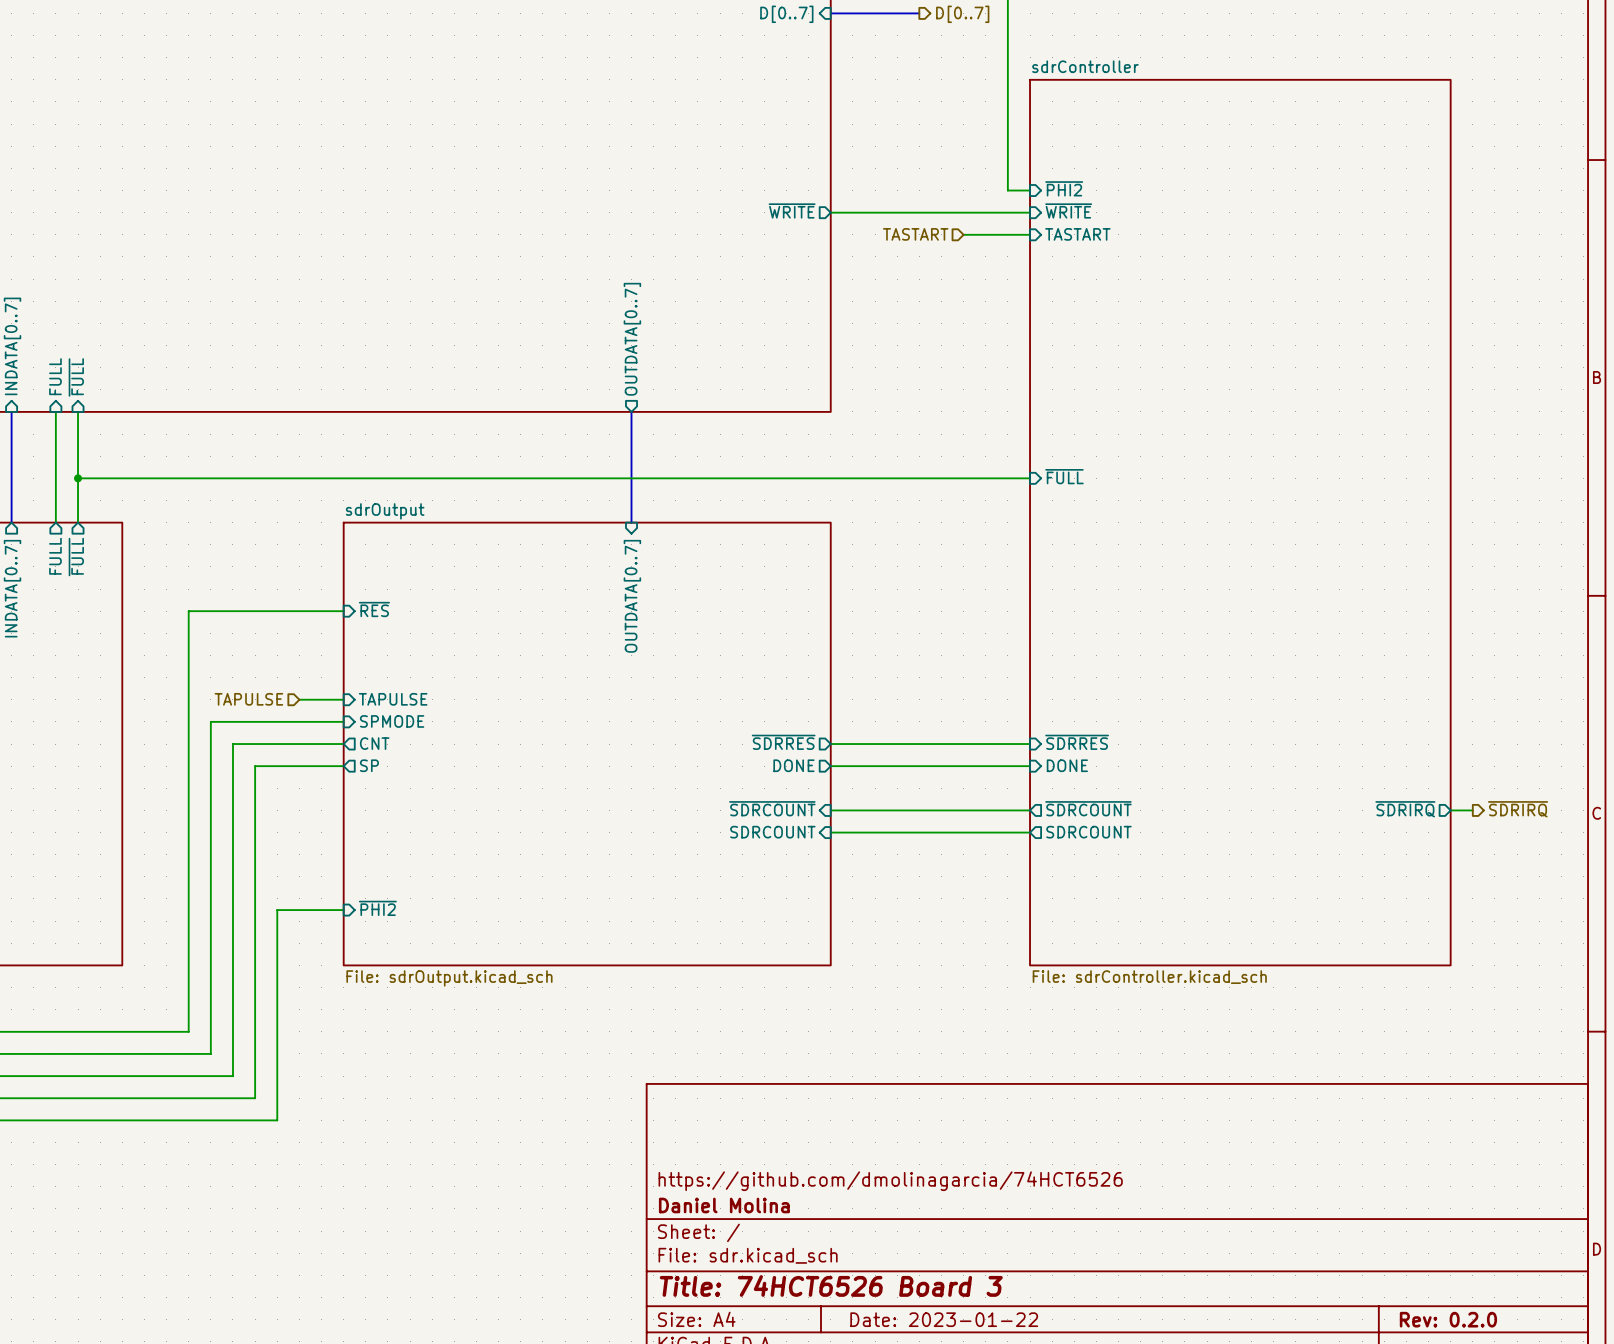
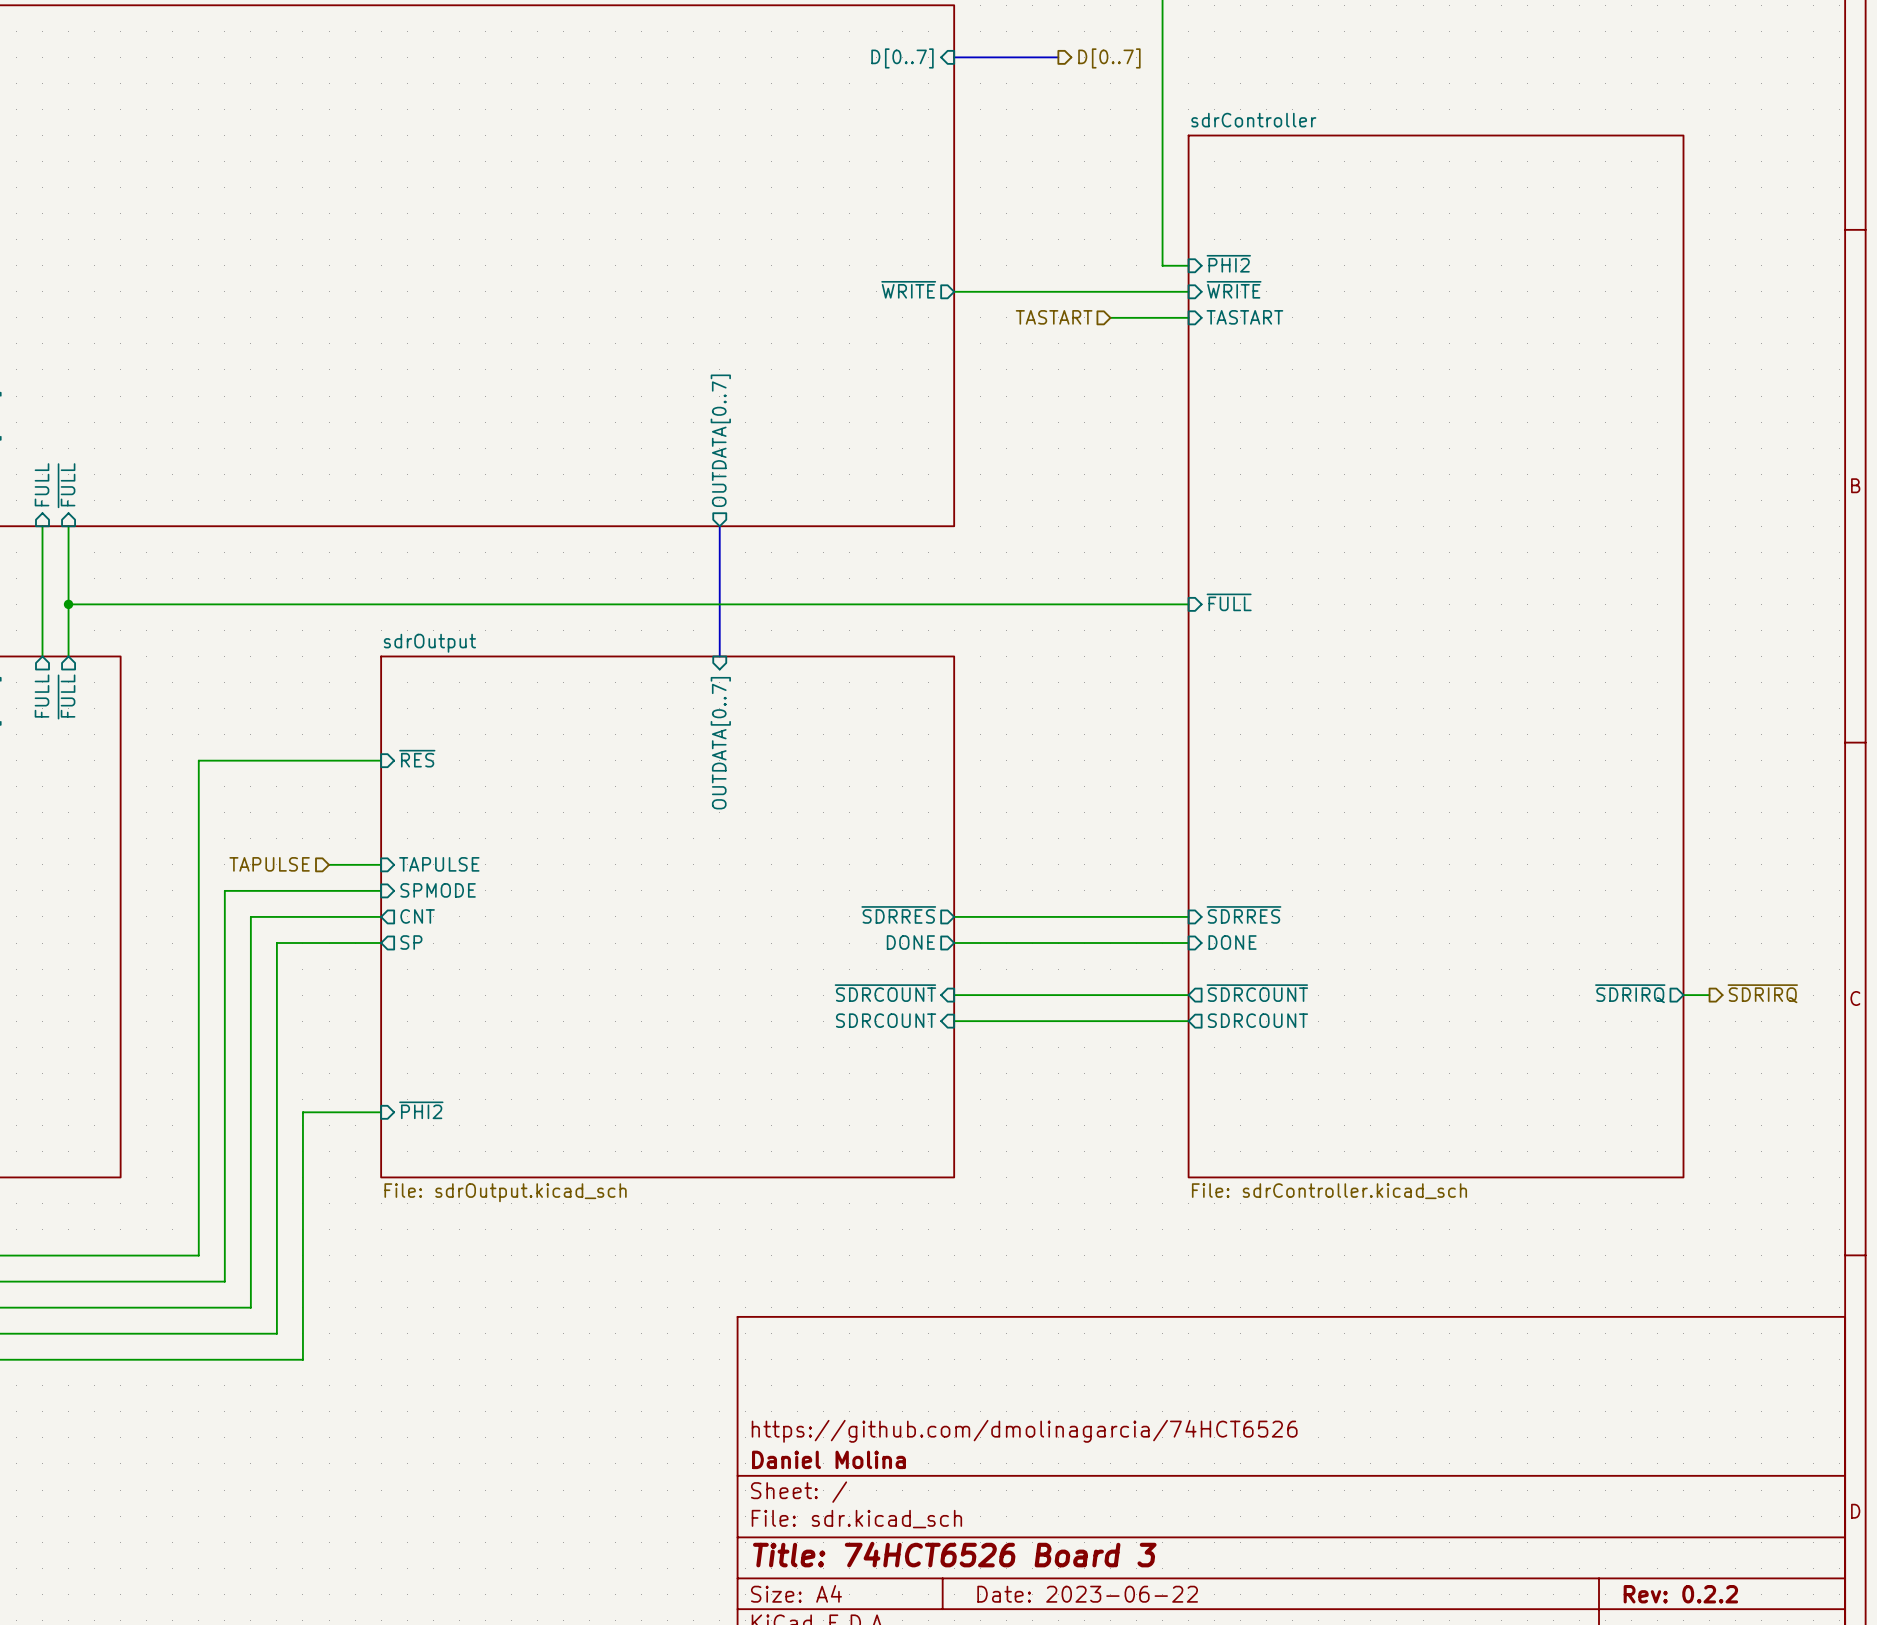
title block: Date: 2023-01-22 (944, 1319) -> Date: 2023-06-22 (1087, 1594)
title block: Rev: 0.2.0 (1448, 1319) -> Rev: 0.2.2 (1680, 1594)

